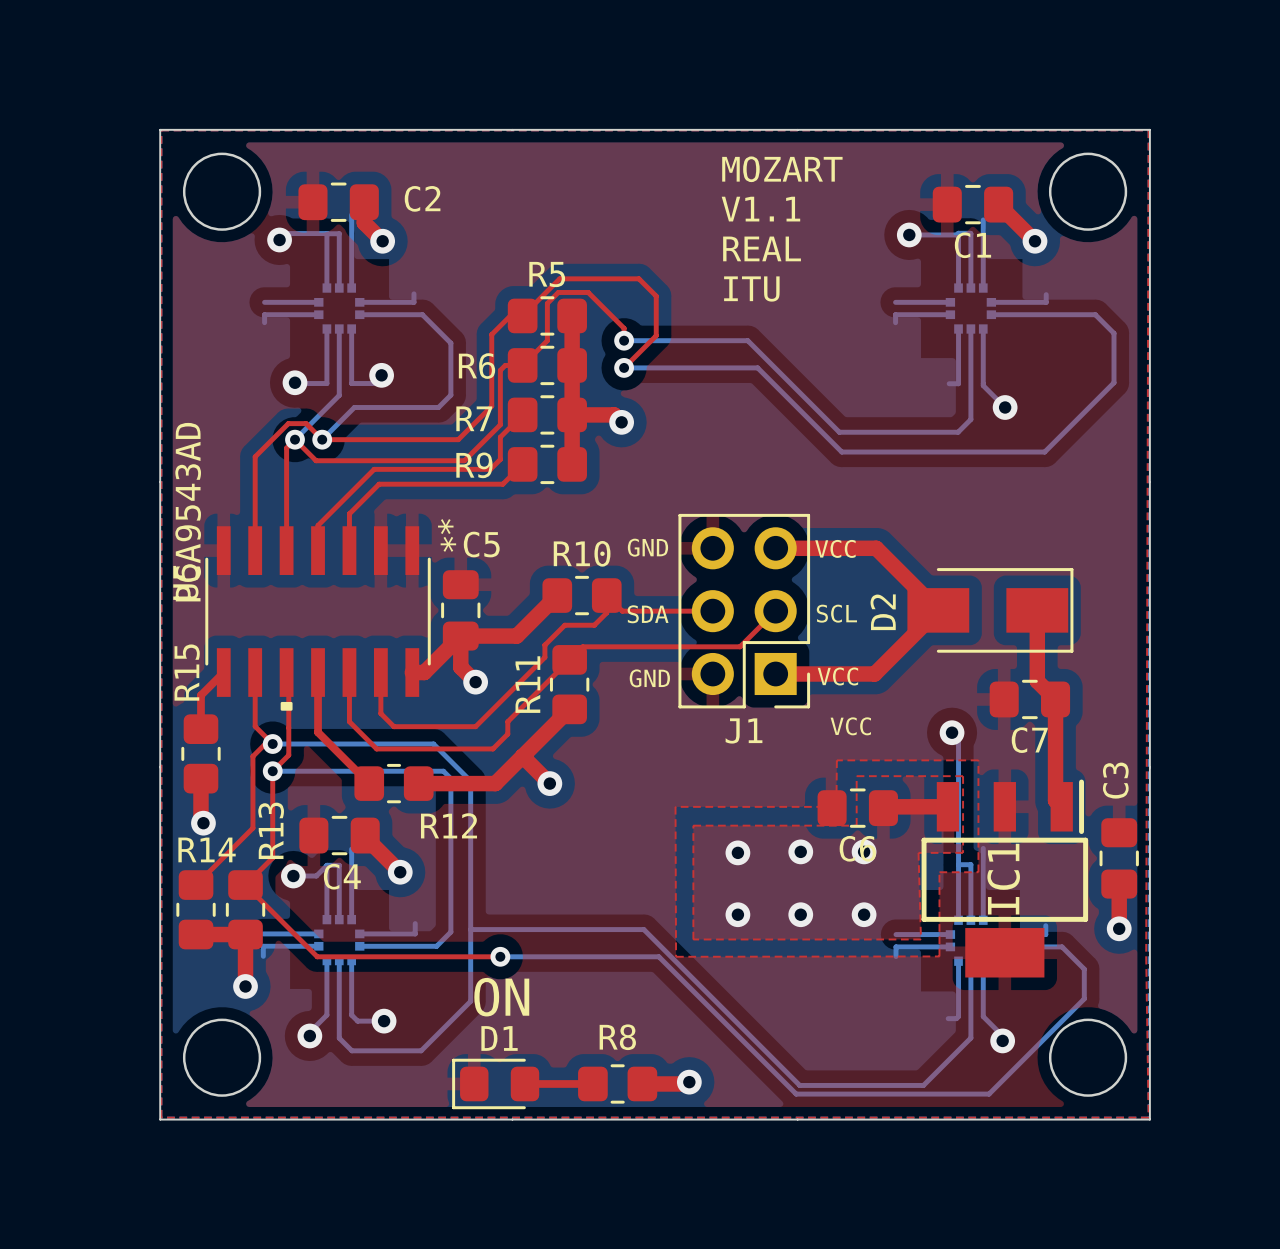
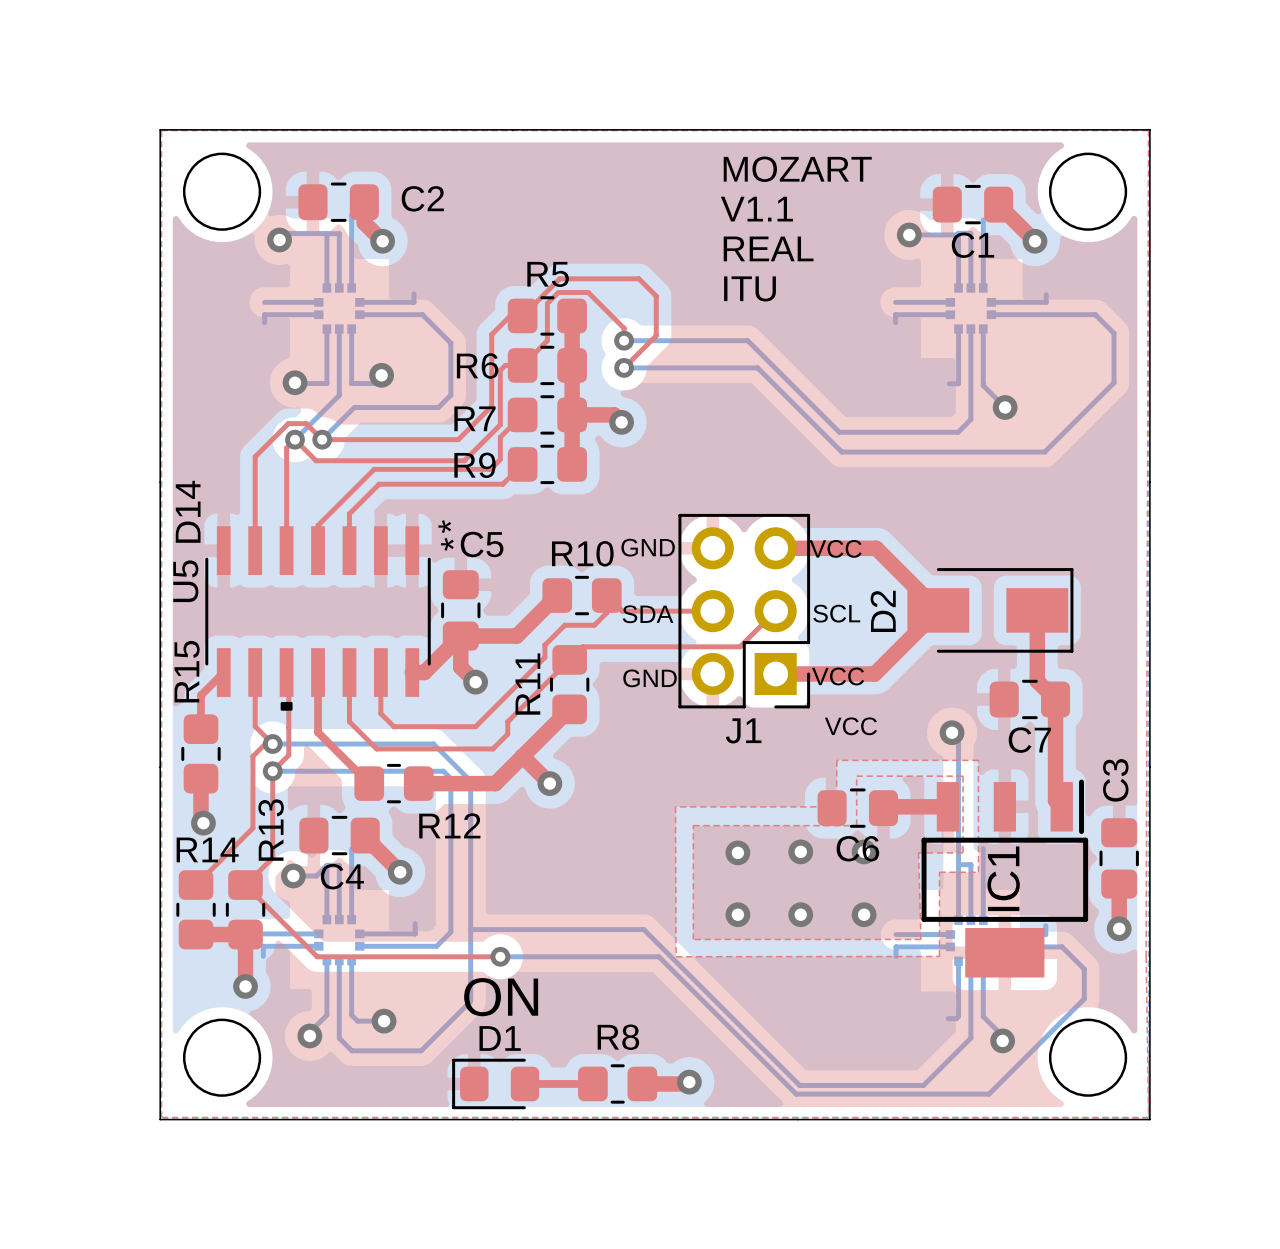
U5 value: PCA9543AD (188, 512) -> D14 (188, 511)

